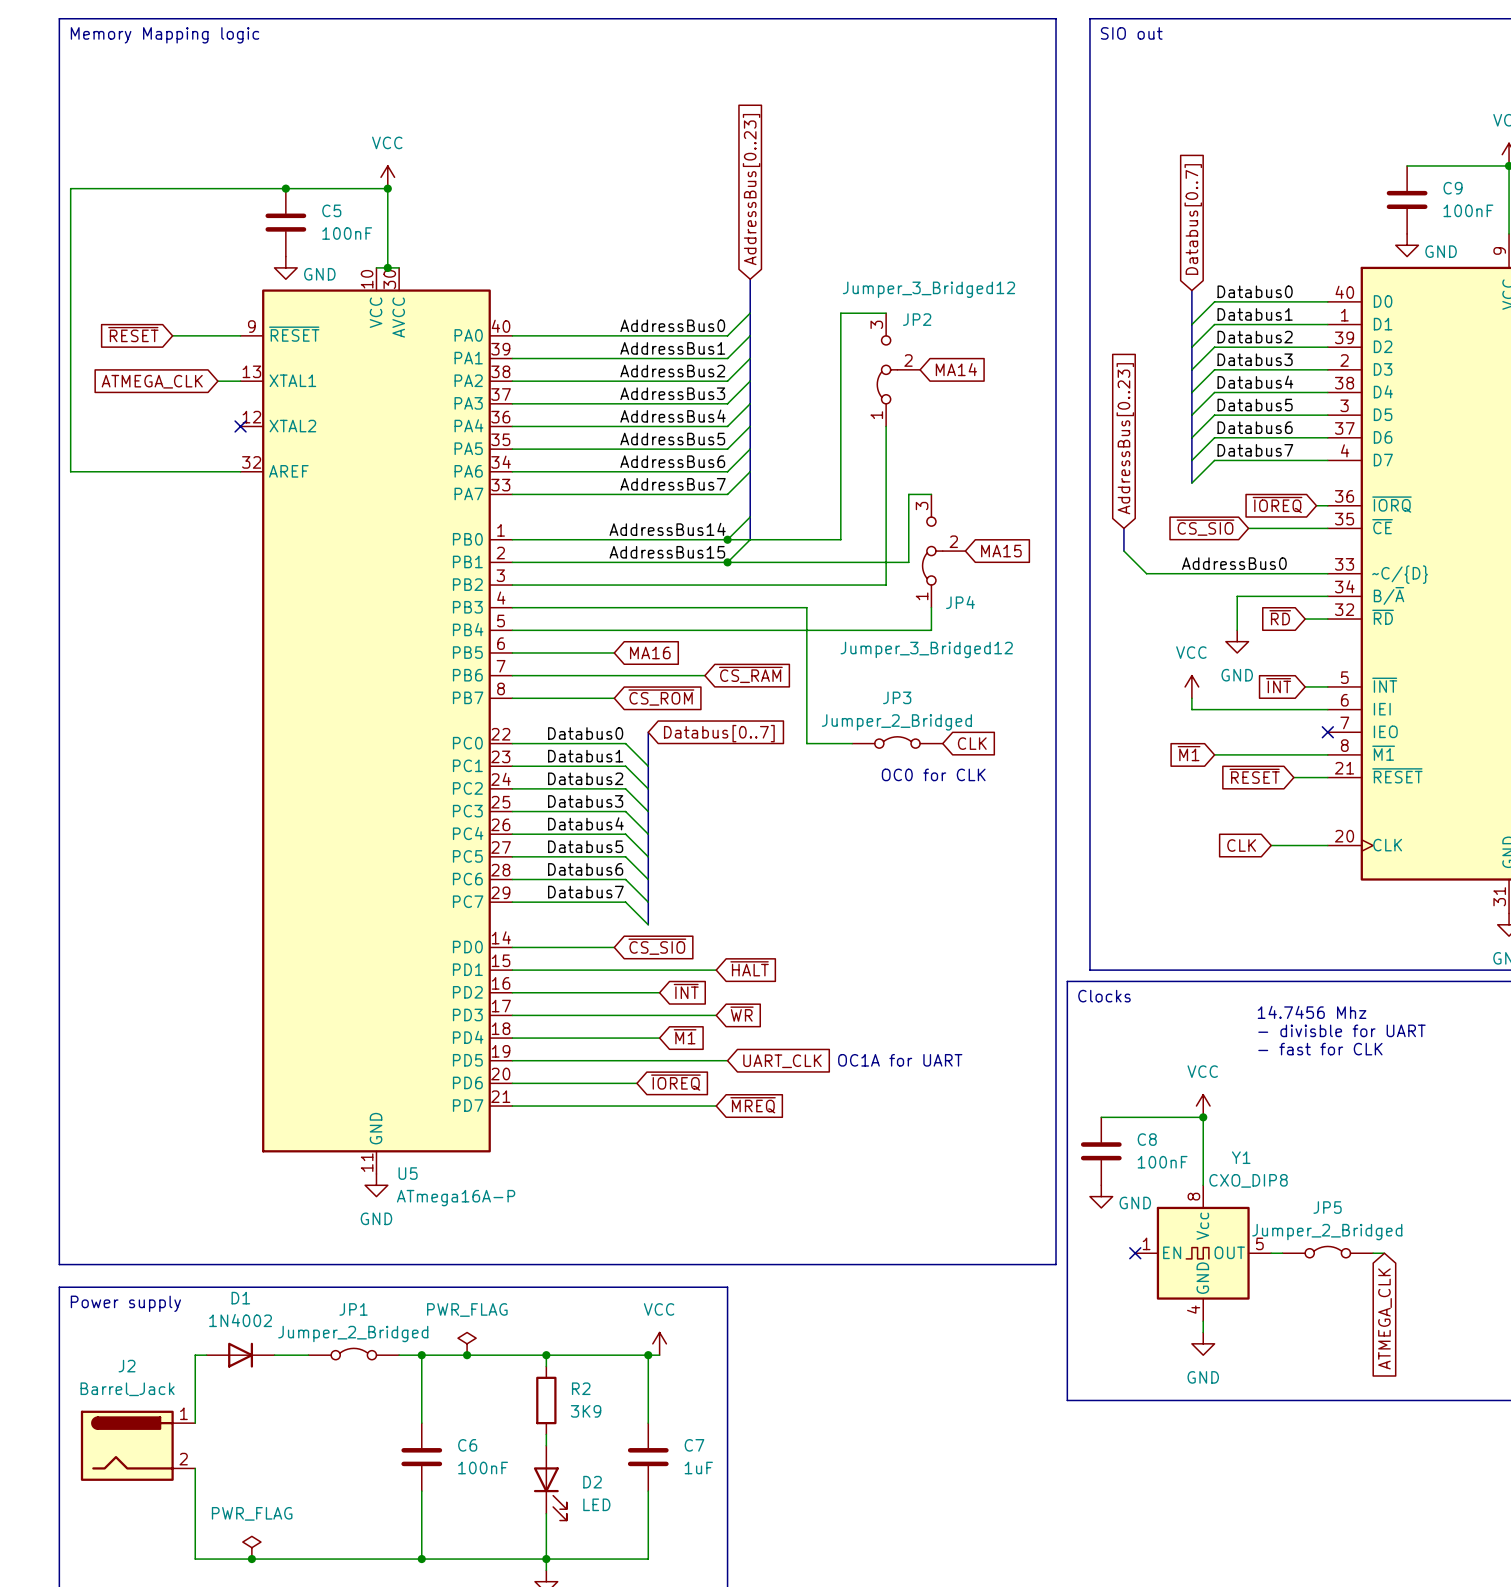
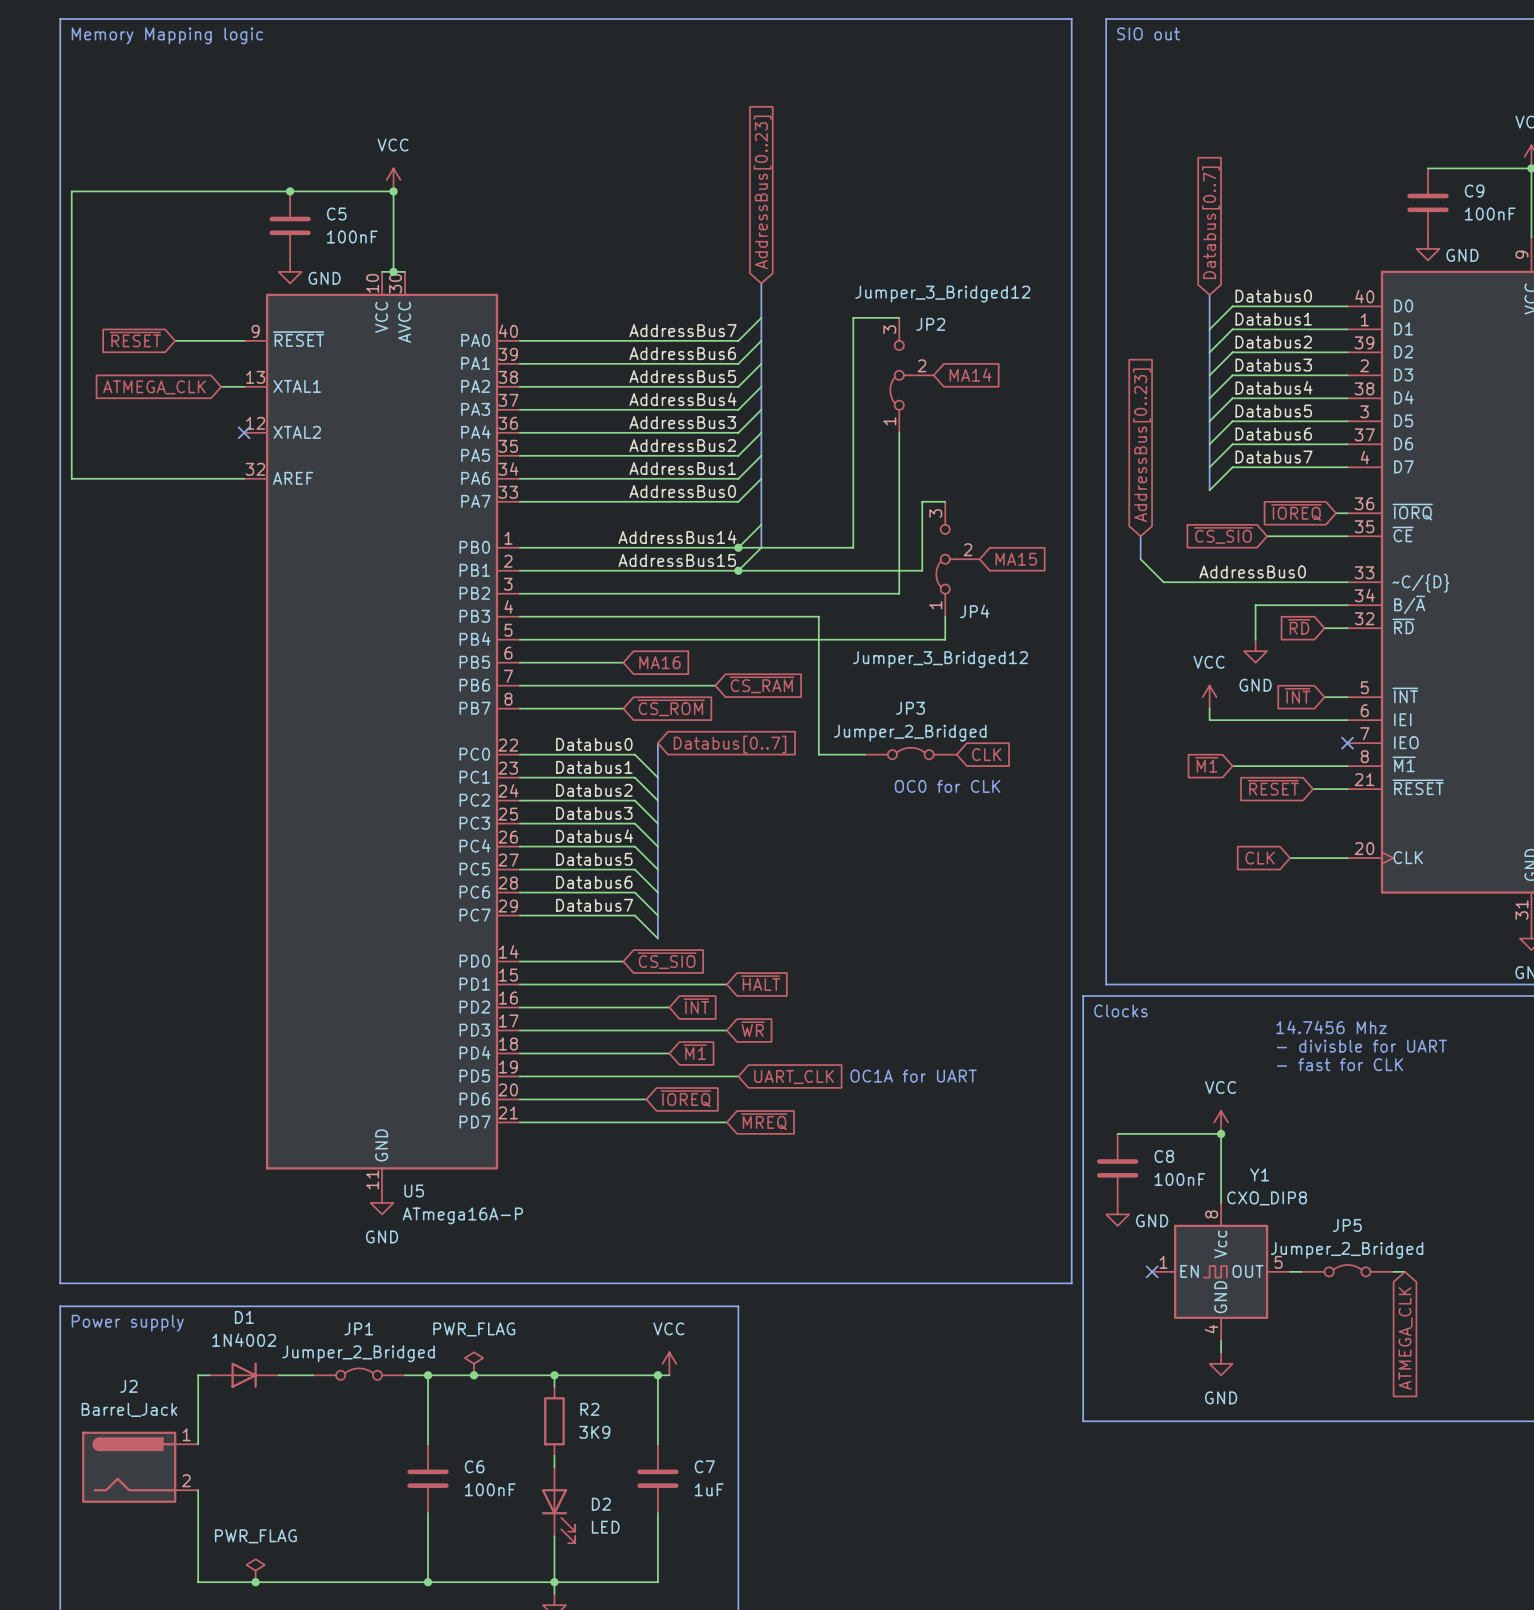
label: AddressBus0 (672, 325) -> AddressBus7 (683, 330)
label: AddressBus1 (672, 348) -> AddressBus6 (682, 353)
label: AddressBus2 (672, 371) -> AddressBus5 (682, 376)
label: AddressBus3 (672, 393) -> AddressBus4 (683, 399)
label: AddressBus4 (673, 416) -> AddressBus3 (682, 422)
label: AddressBus5 (672, 439) -> AddressBus2 (682, 445)
label: AddressBus6 (672, 461) -> AddressBus1 (682, 468)
label: AddressBus7 (673, 484) -> AddressBus0 (682, 491)

